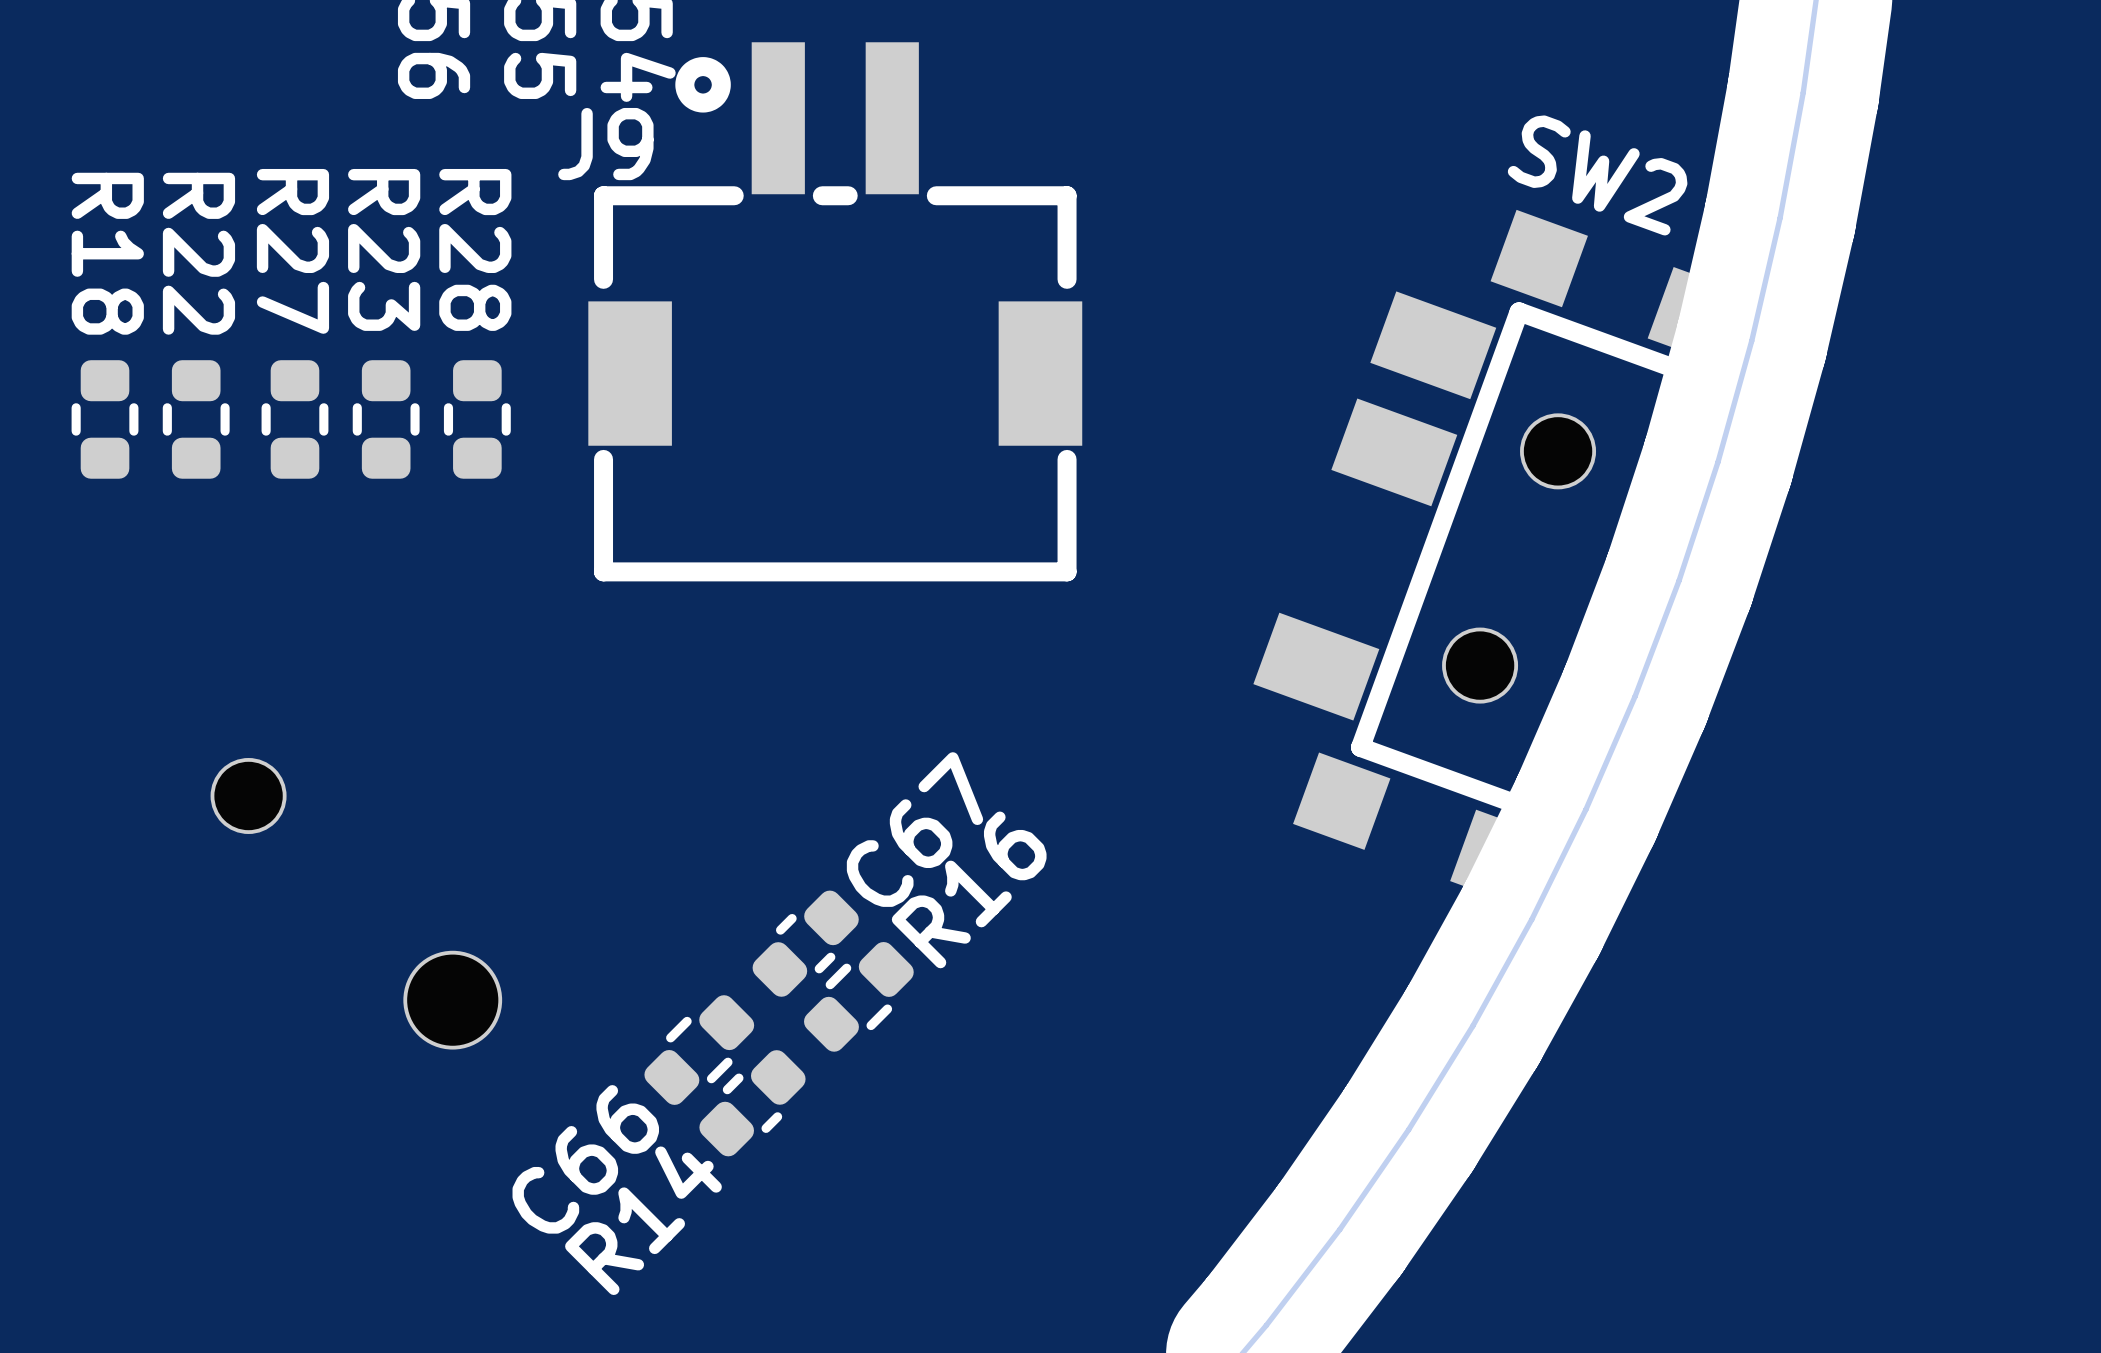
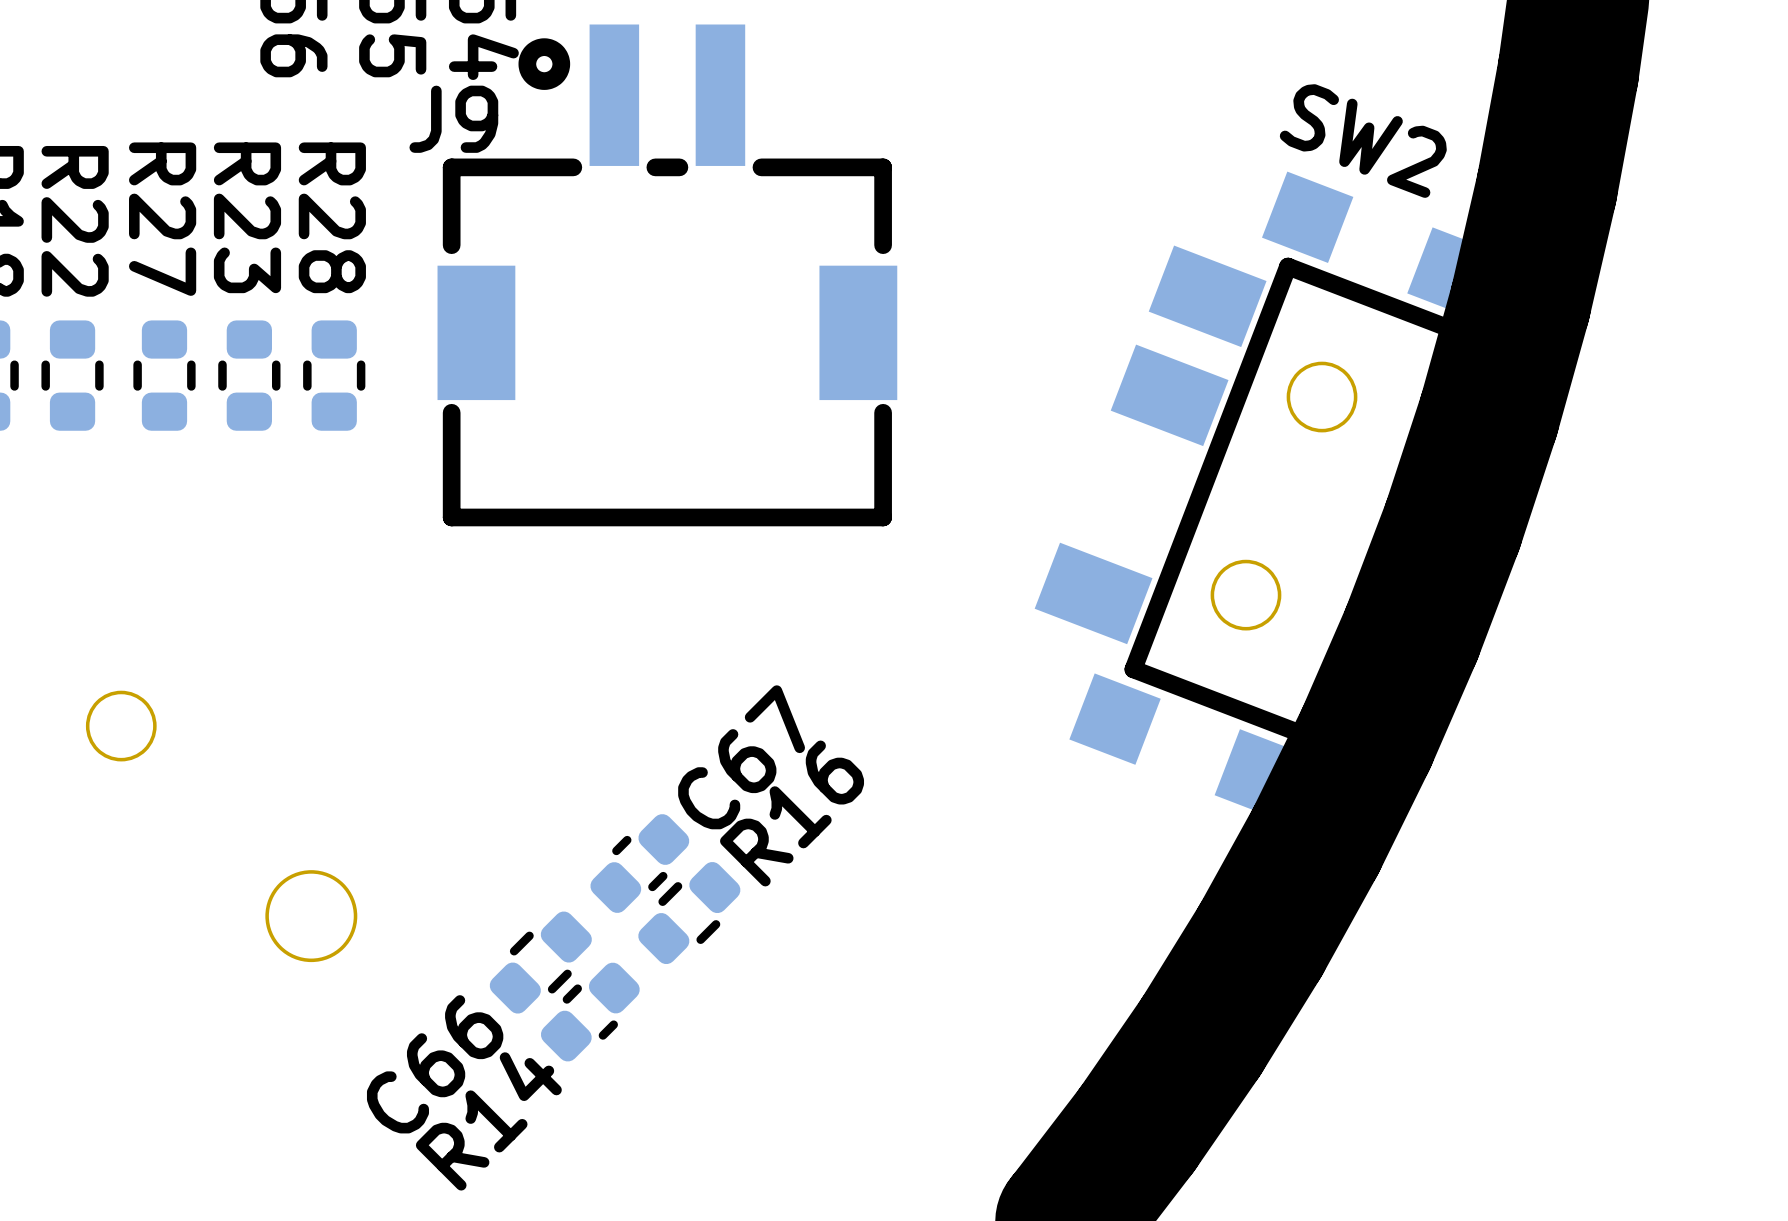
SW2 rotation: 0° (1513, 558) -> 1° clockwise (1277, 496)

